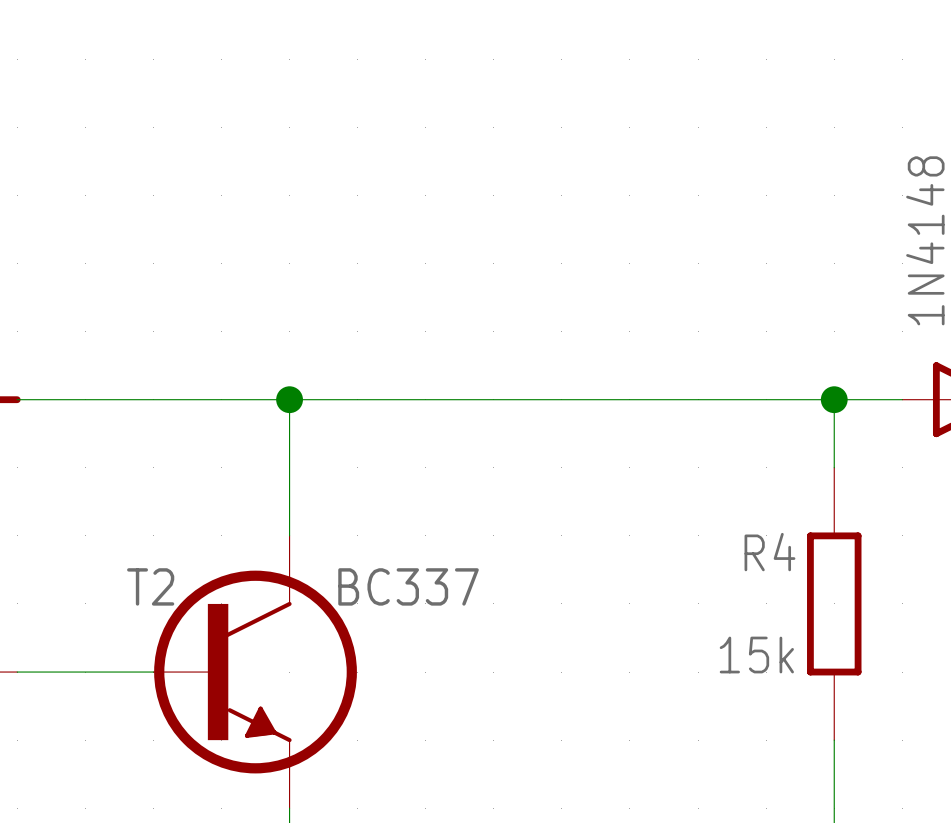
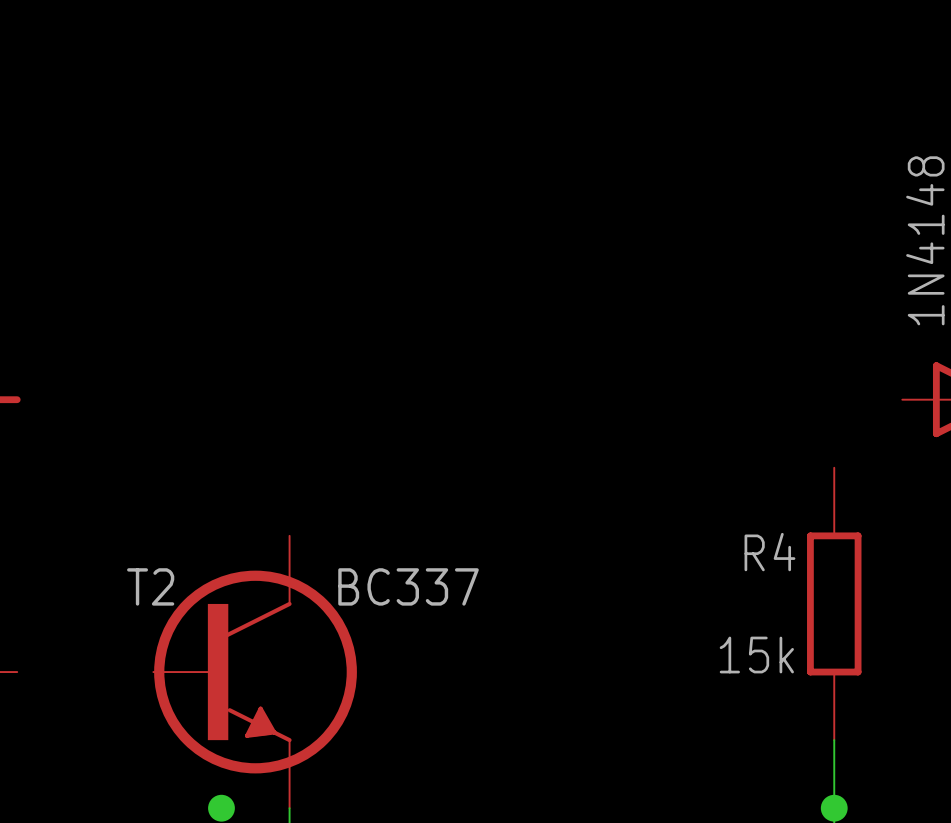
wire: (17, 399) (902, 399) -> none
wire: (289, 399) (289, 535) -> none
junction: (289, 399) -> none
wire: (834, 399) (834, 467) -> none
junction: (834, 399) -> none
wire: (17, 672) (153, 672) -> none
junction: none -> (221, 808)
junction: none -> (834, 808)

